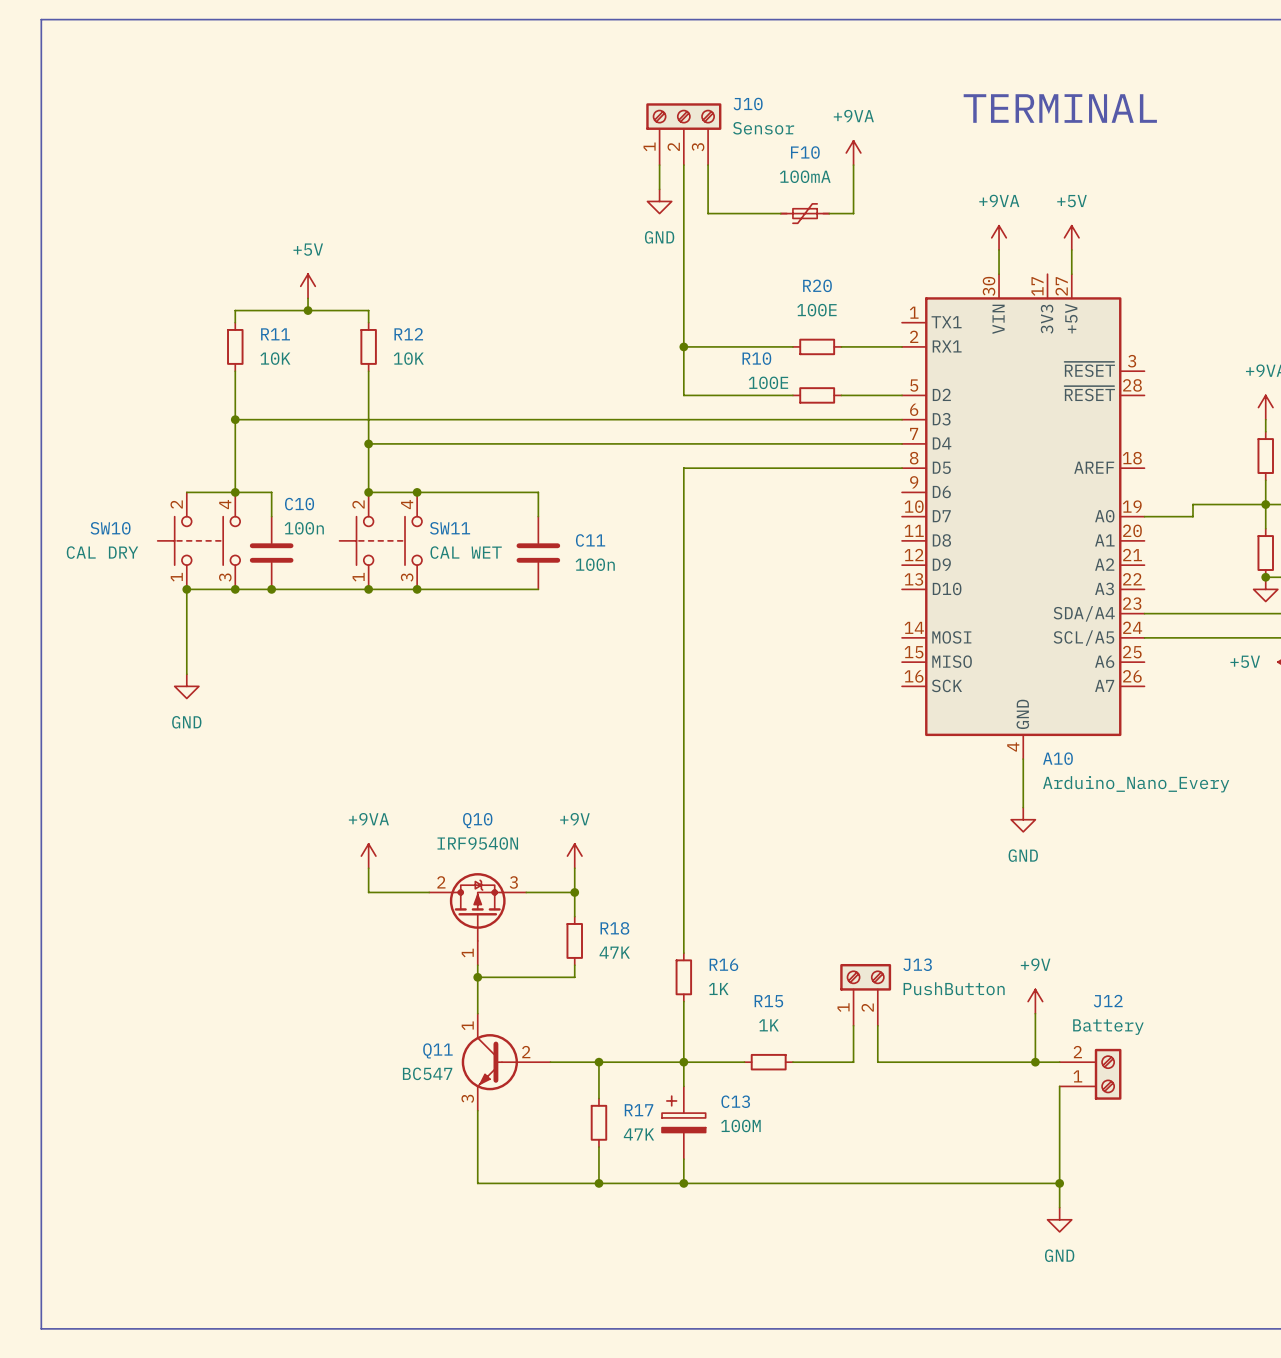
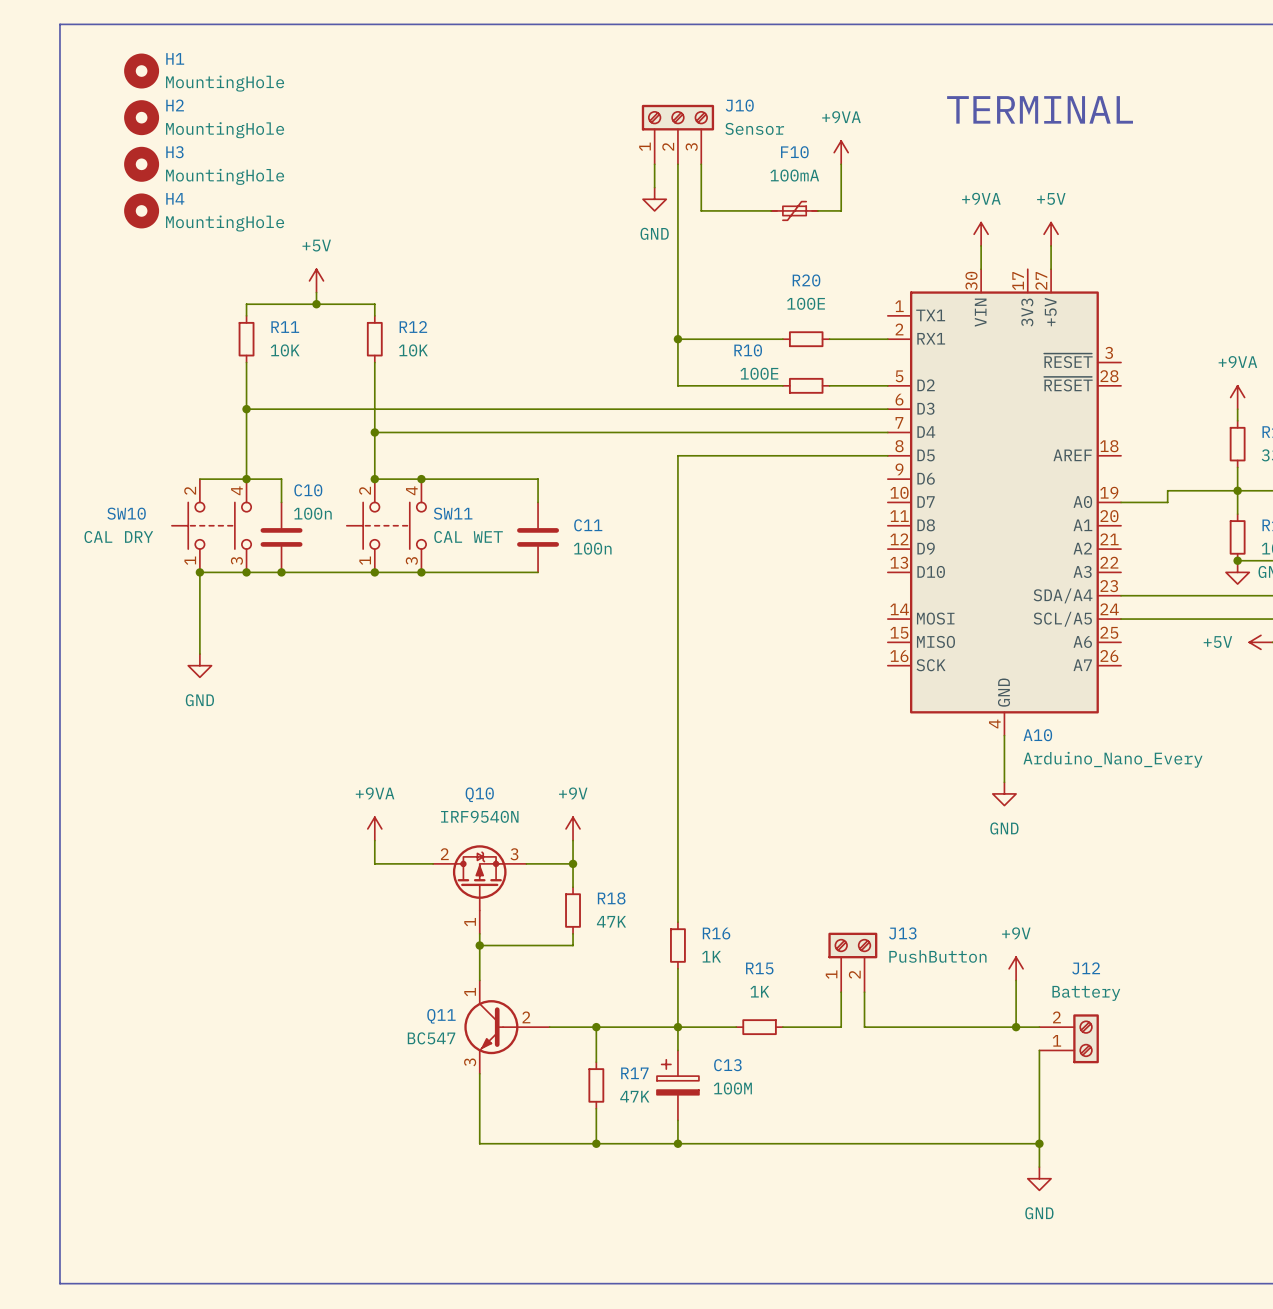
H1: none -> MountingHole (141, 71)
H2: none -> MountingHole (141, 117)
H3: none -> MountingHole (141, 164)
H4: none -> MountingHole (141, 210)

